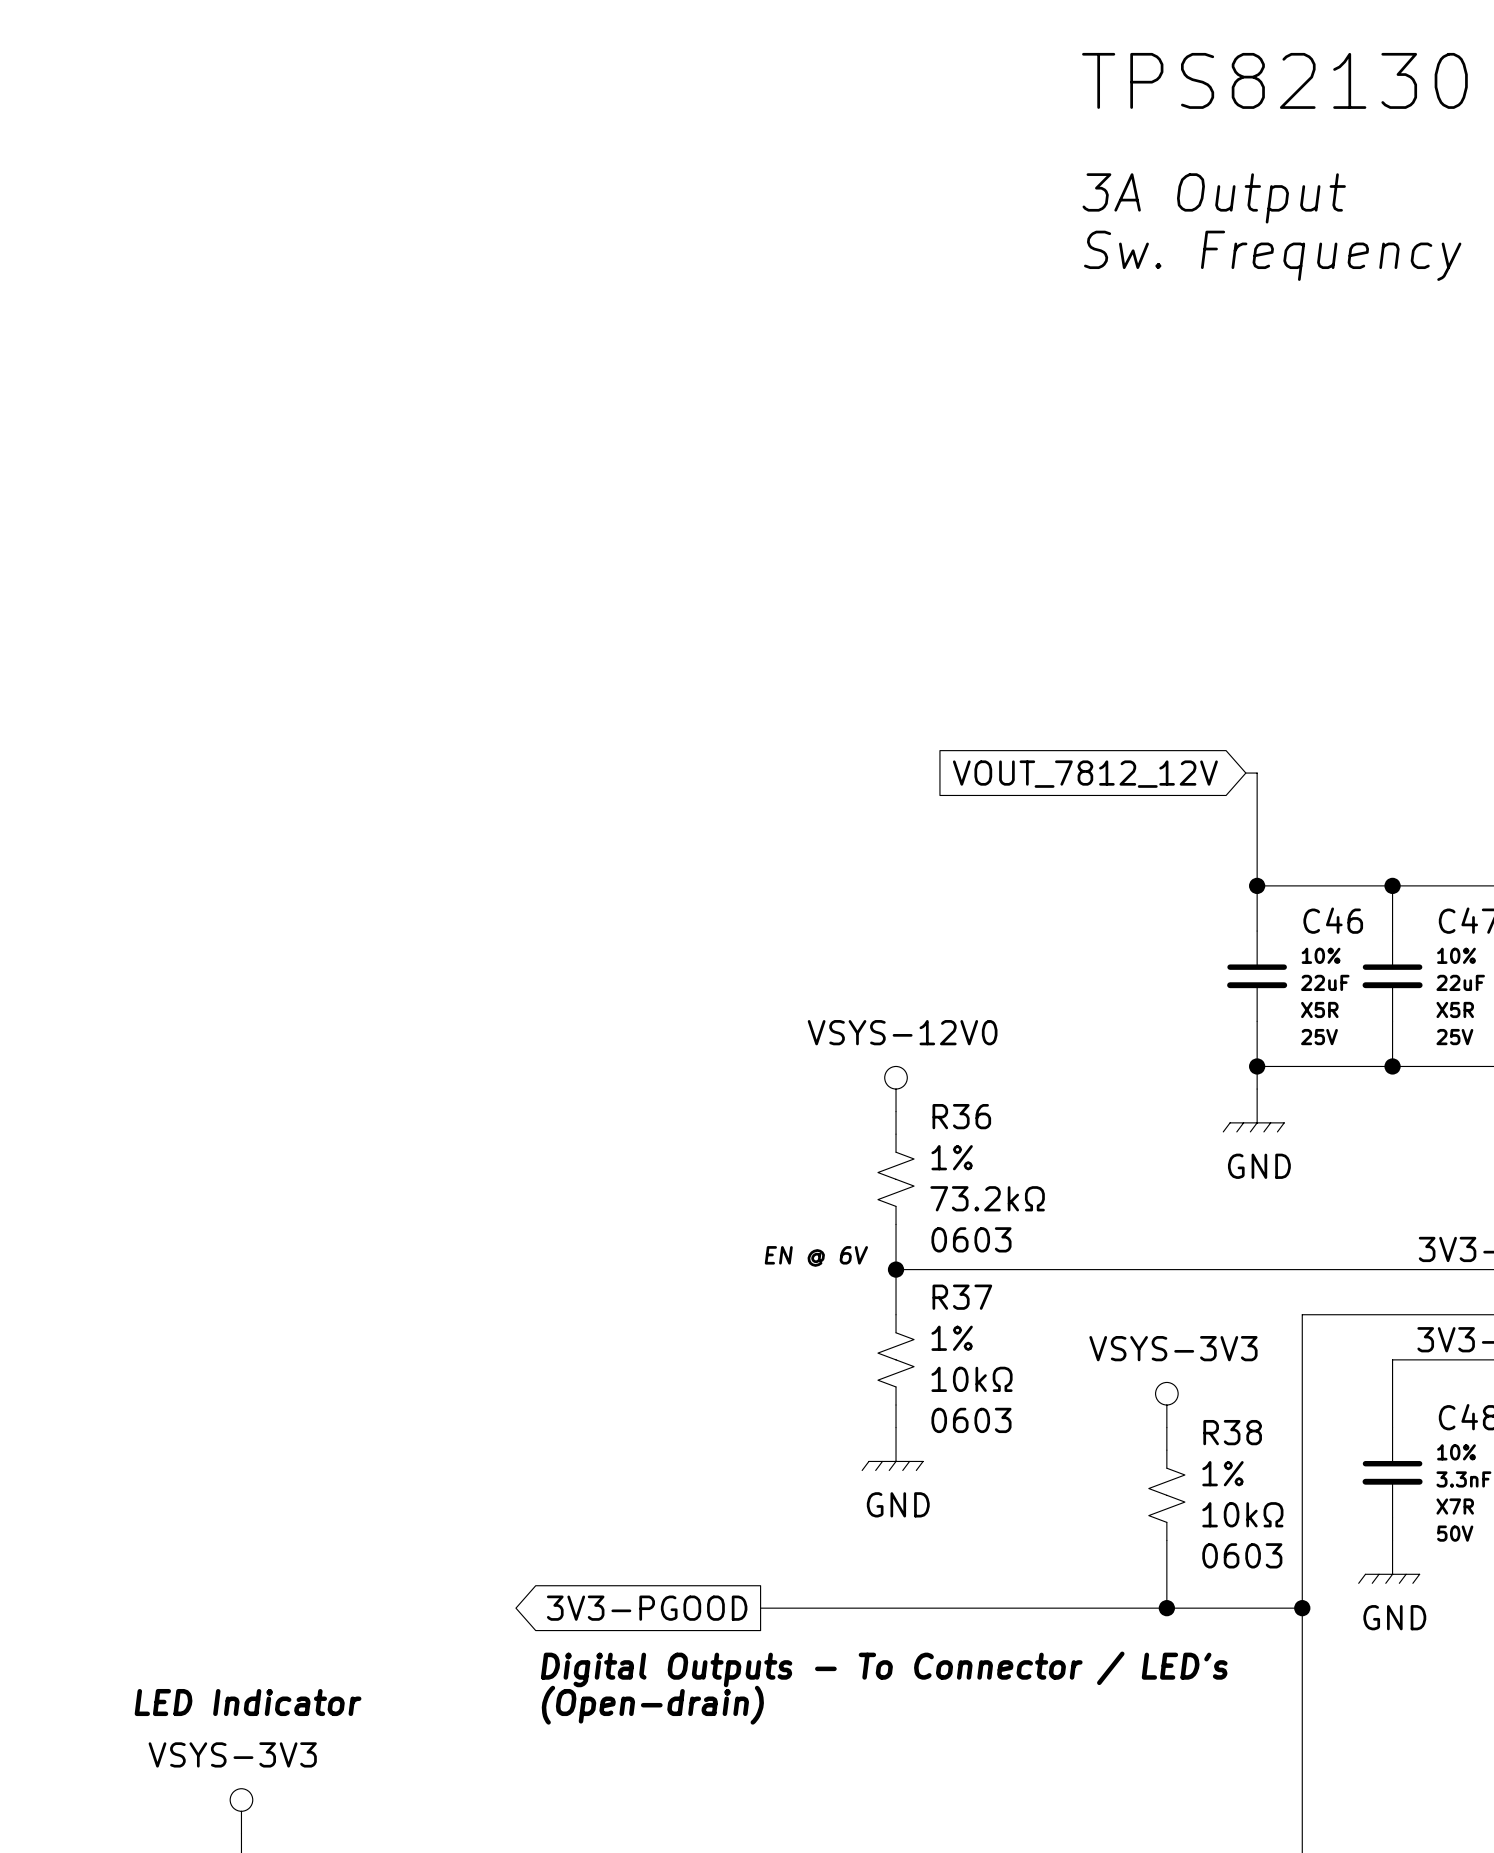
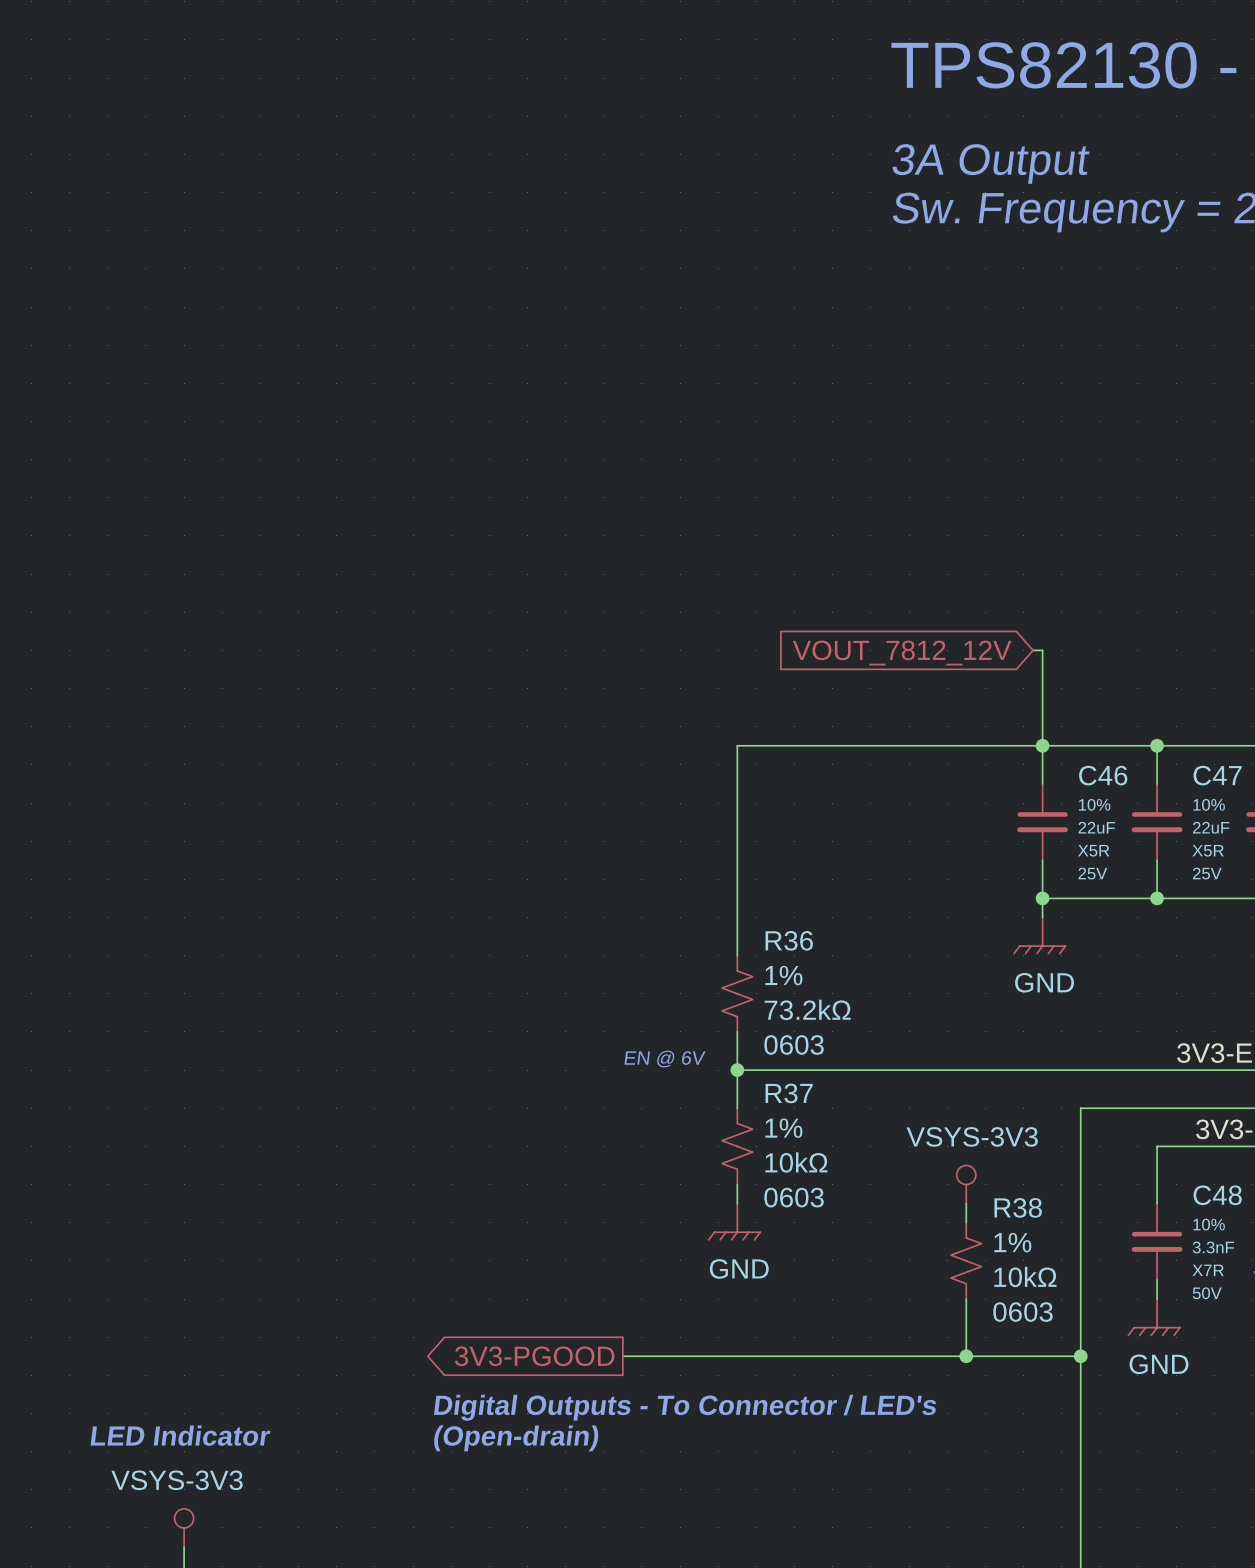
wire: none -> (1042, 745) (737, 745) (737, 936)
power symbol: VSYS-12V0 (896, 1089) -> none

